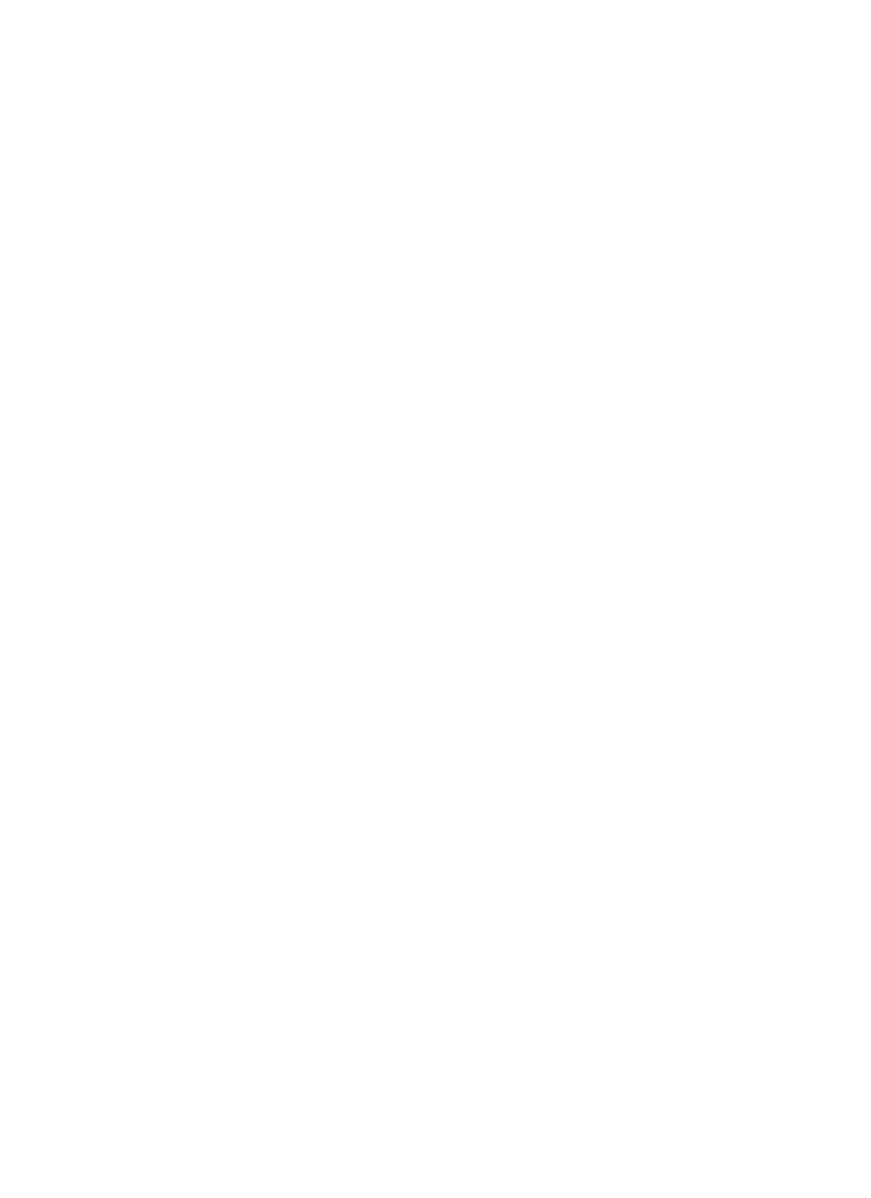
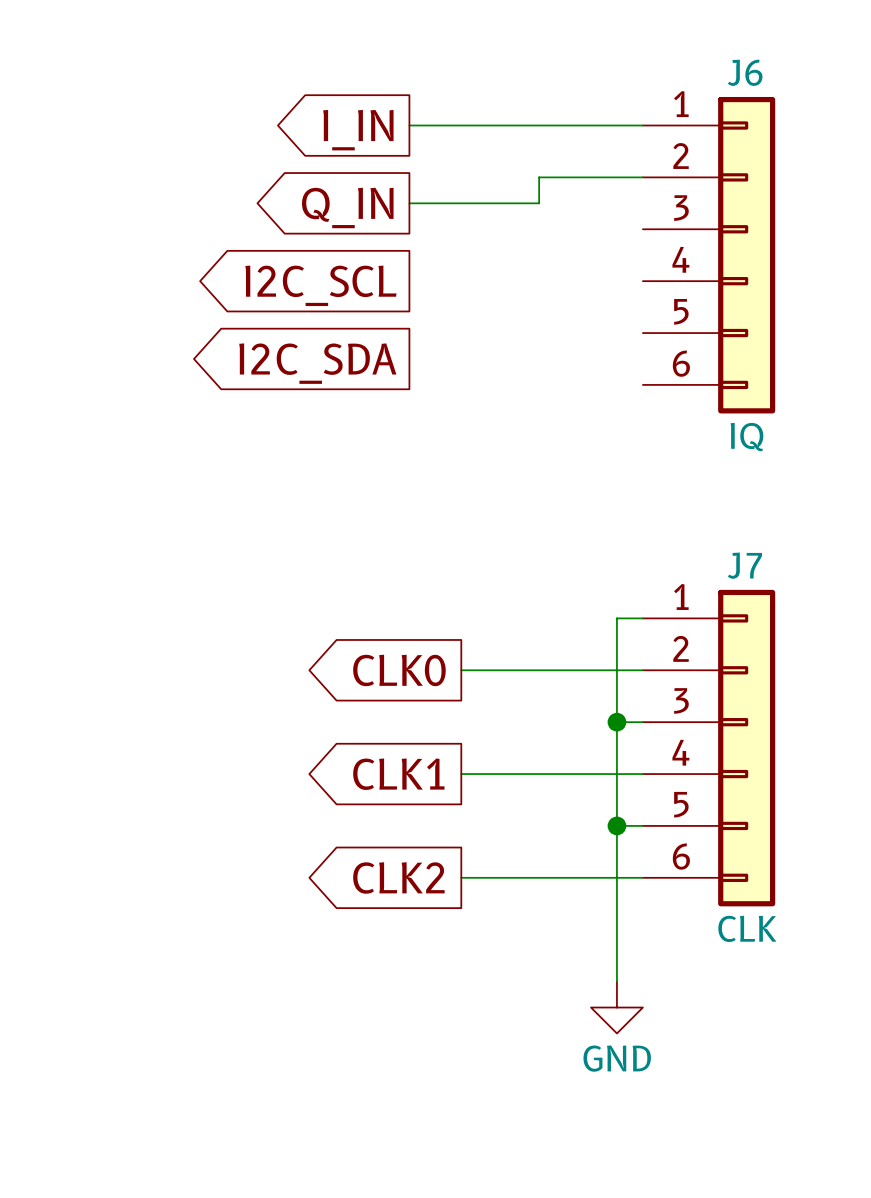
wire: none -> (409, 125) (642, 125)
global label: none -> I_IN (358, 130)
wire: none -> (642, 177) (539, 177) (539, 203) (409, 203)
global label: none -> Q_IN (347, 207)
J6: none -> IQ (709, 255)
global label: none -> I2C_SCL (320, 285)
global label: none -> I2C_SDA (317, 363)
wire: none -> (642, 618) (616, 618) (616, 981)
global label: none -> CLK0 (399, 670)
wire: none -> (461, 670) (642, 670)
wire: none -> (616, 722) (642, 722)
junction: none -> (616, 722)
J7: none -> CLK (709, 748)
global label: none -> CLK1 (398, 774)
wire: none -> (461, 774) (642, 774)
wire: none -> (616, 825) (642, 825)
junction: none -> (616, 825)
global label: none -> CLK2 (398, 877)
wire: none -> (461, 877) (642, 877)
power symbol: none -> GND (616, 1007)

